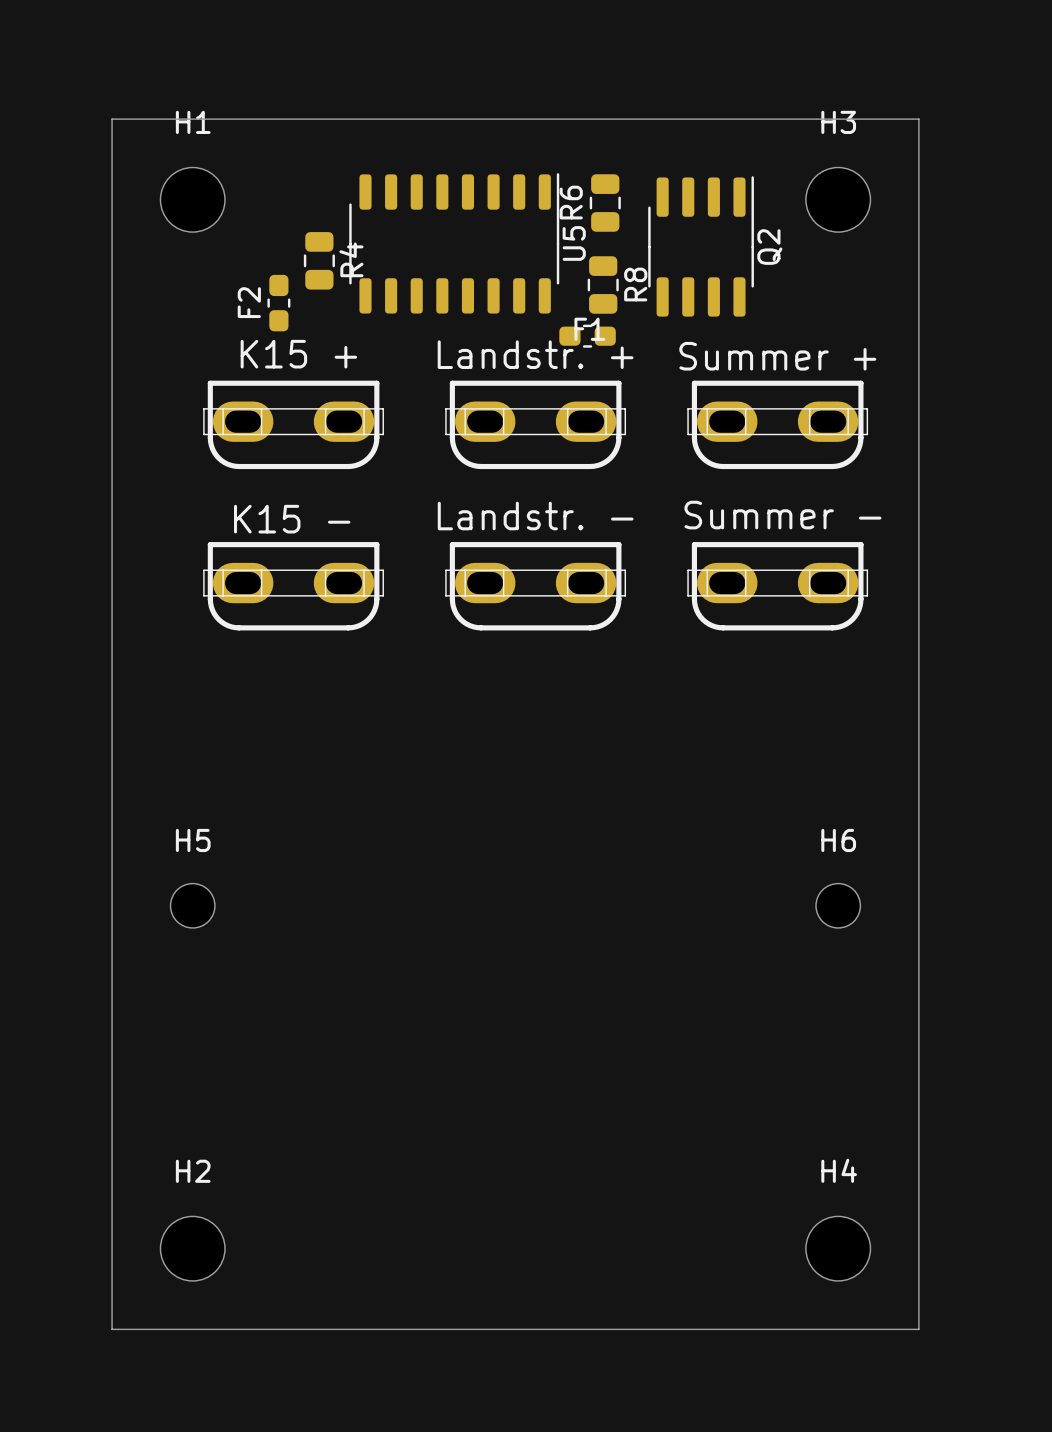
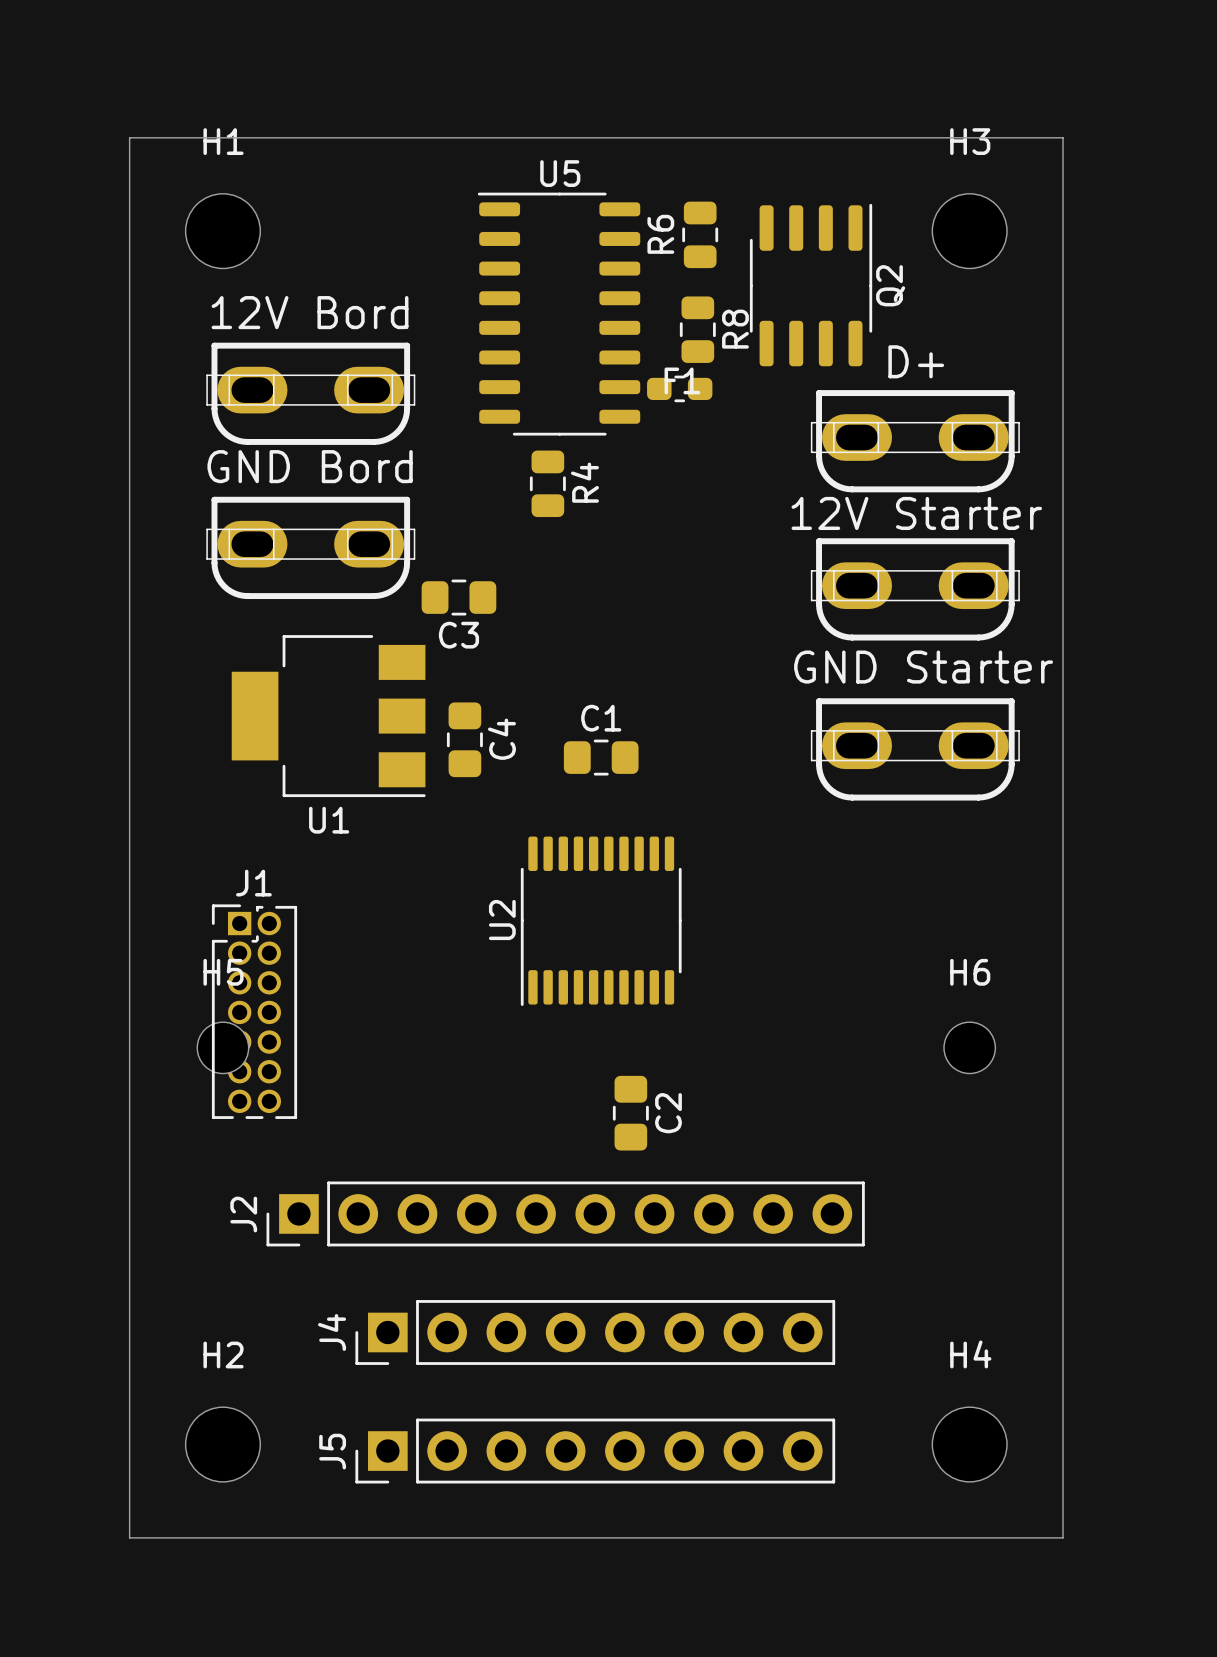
U5 rotation: 0° (454, 243) -> 90° counterclockwise (559, 314)
R4 position: (319, 260) -> (547, 483)
F2: (278, 303) -> none
part: none -> 12V Bord (310, 393)
part: none -> D+ (915, 441)
part: K15 + (293, 424) -> none
part: Landstr. + (535, 424) -> none
part: Summer + (777, 424) -> none
part: none -> GND Bord (310, 547)
part: none -> 12V Starter (915, 589)
C3: none -> (458, 597)
part: K15 - (293, 586) -> none
part: Landstr. - (535, 586) -> none
part: Summer - (777, 586) -> none
U1: none -> (328, 716)
C4: none -> (464, 739)
part: none -> GND Starter (915, 749)
C1: none -> (601, 757)
U2: none -> (601, 921)
J1: none -> (254, 1011)
C2: none -> (630, 1113)
J2: none -> (565, 1213)
J4: none -> (595, 1332)
J5: none -> (595, 1451)

